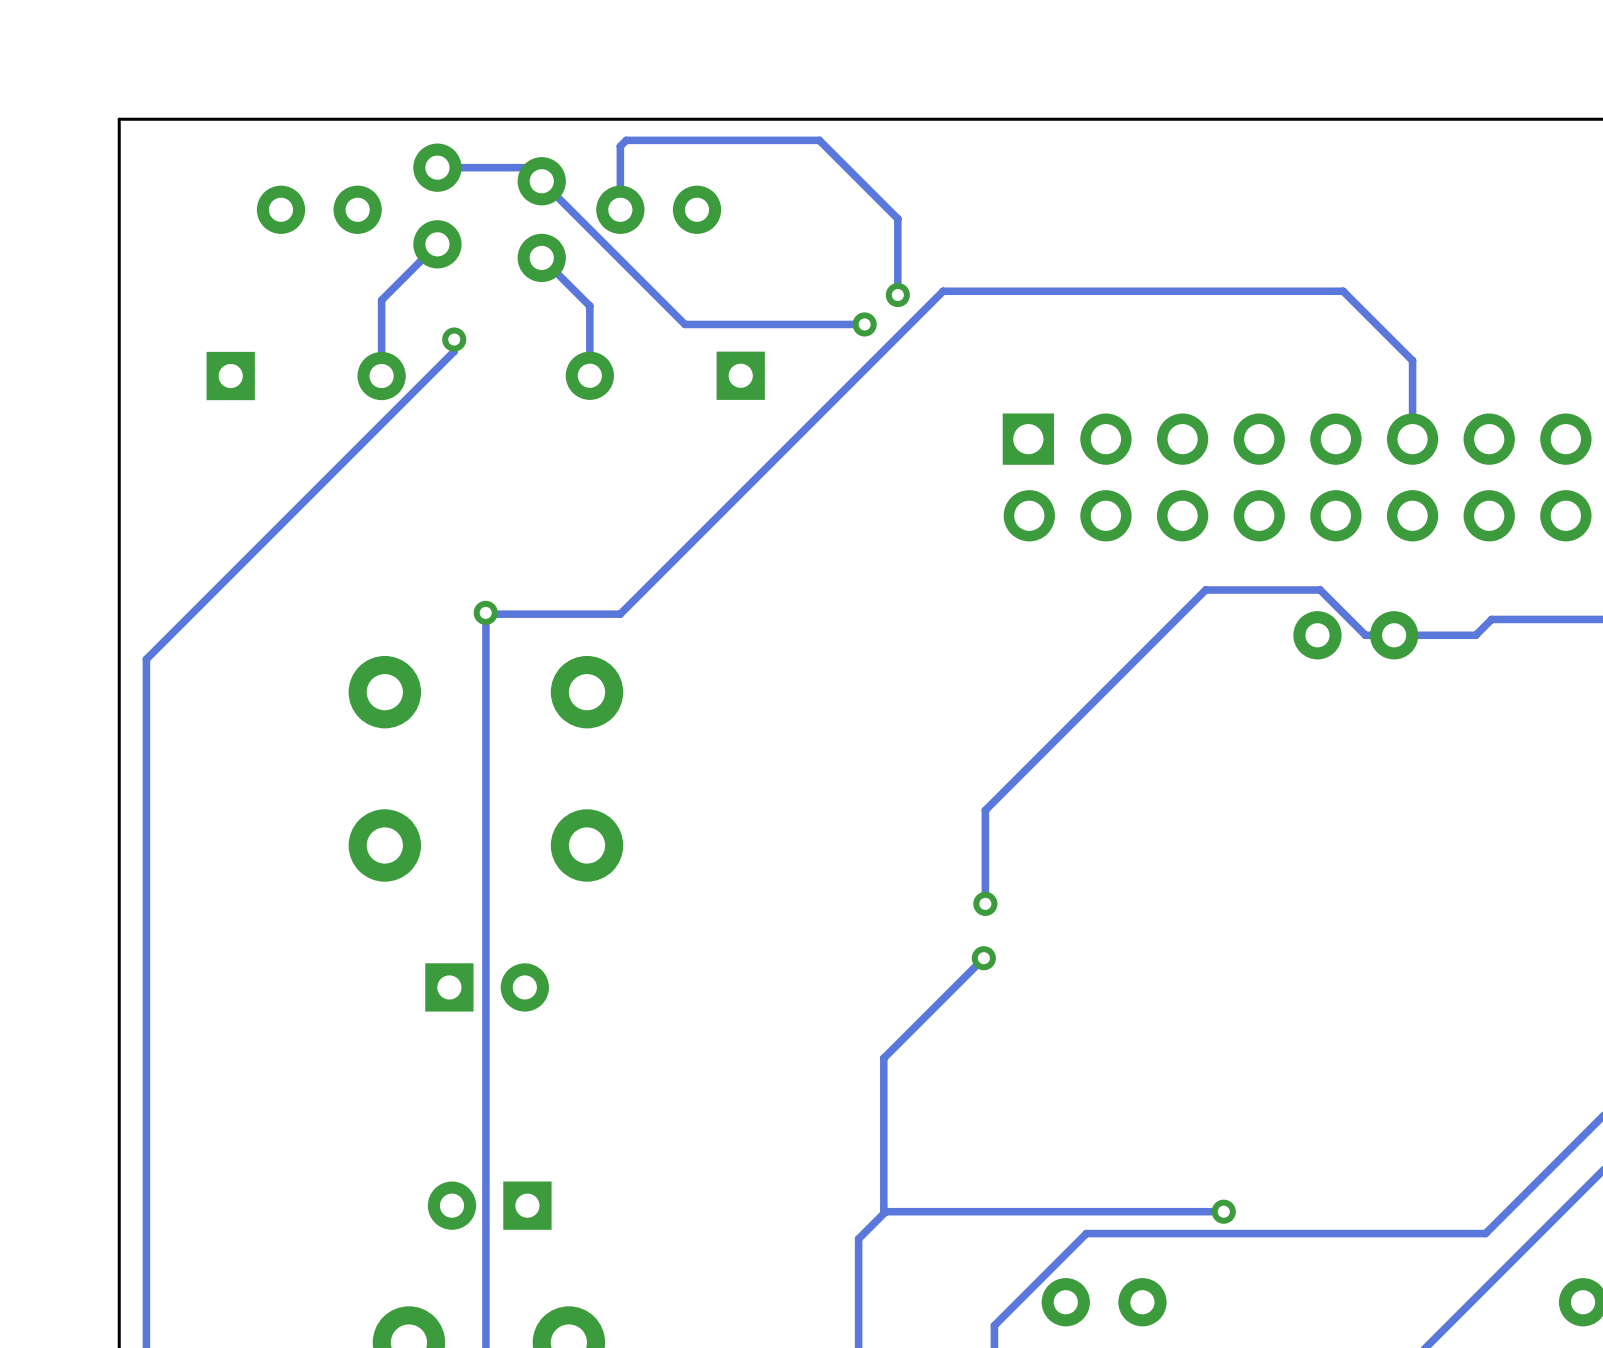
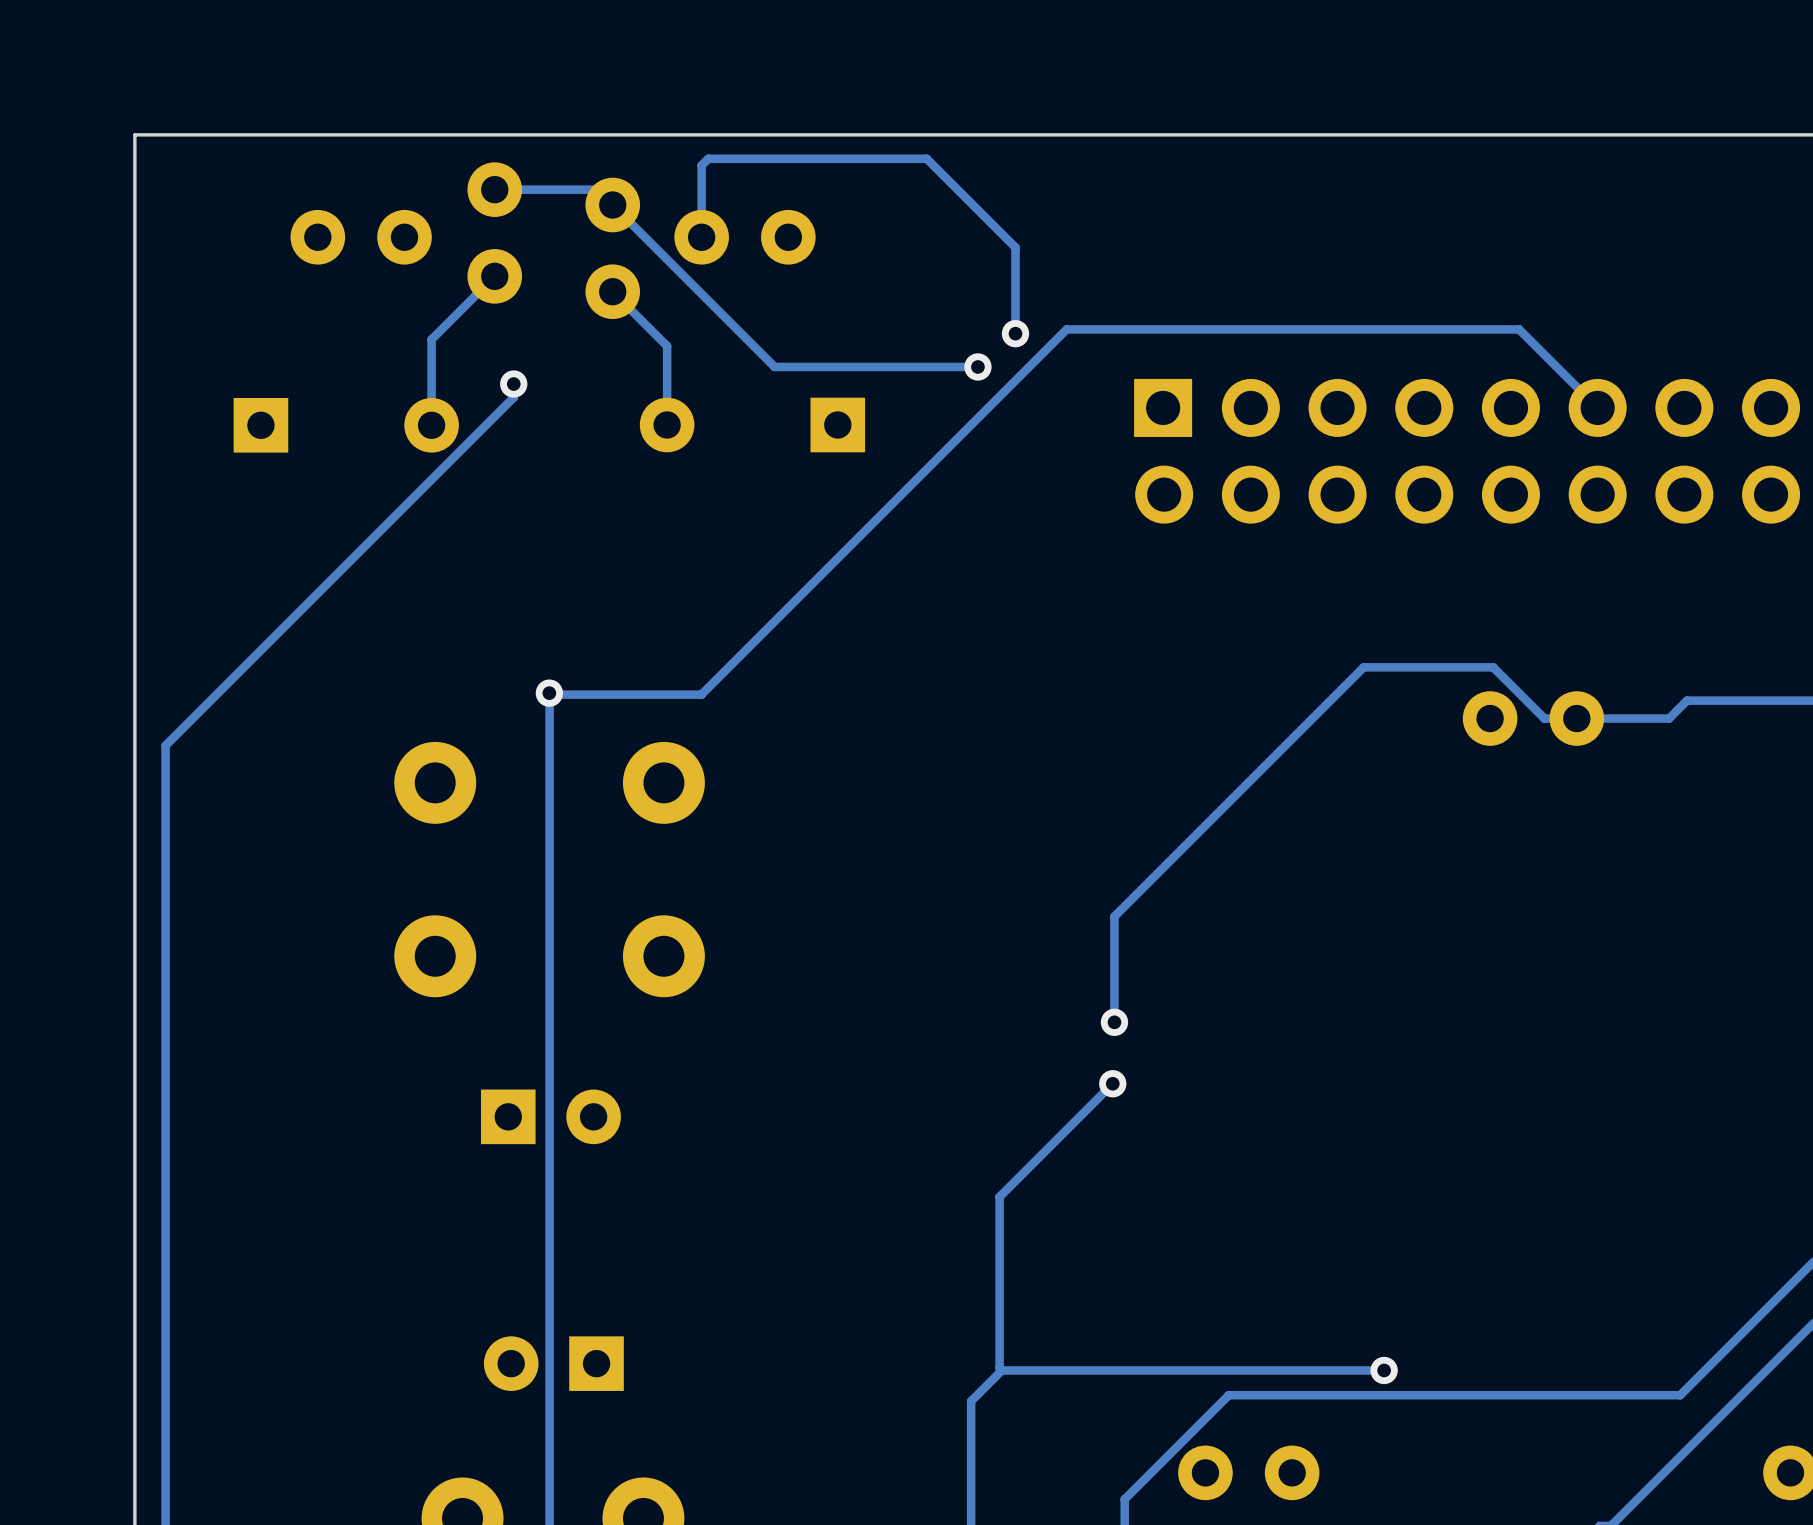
track: (1412, 360) (1412, 439) -> none
part position: (1297, 477) -> (1467, 451)

